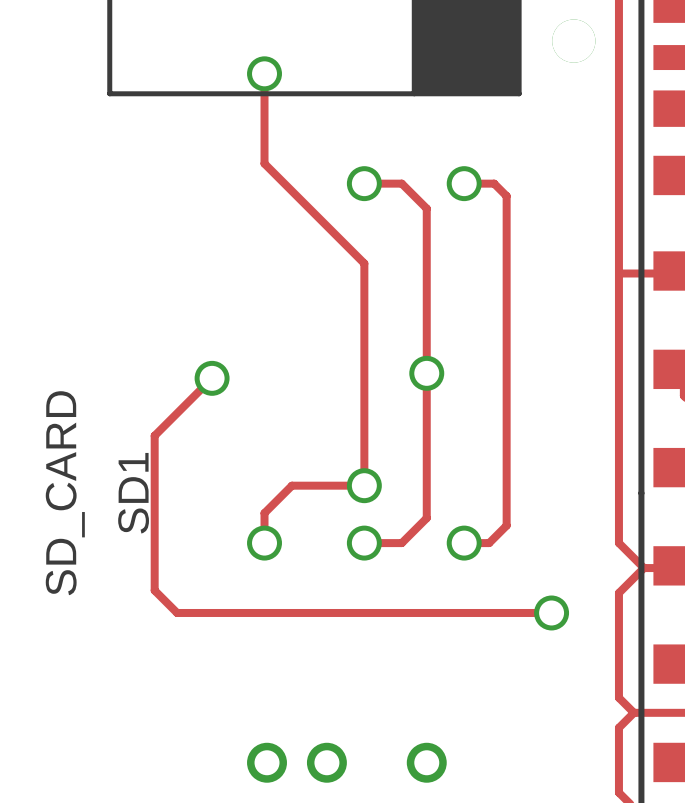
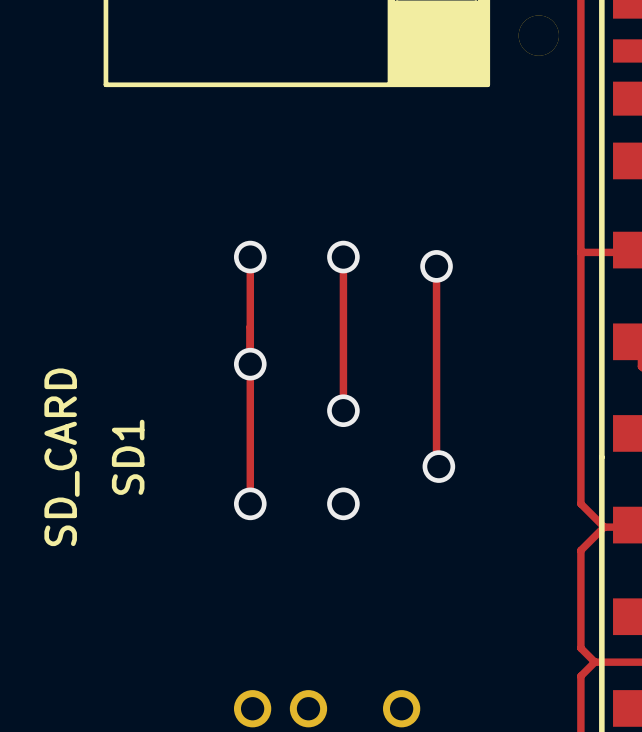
track: (264, 73) (264, 163) (364, 263) (364, 278) -> none
via: (264, 73) -> none
track: (364, 183) (401, 183) (426, 208) (426, 518) (401, 543) (364, 543) -> none
via: (364, 183) -> none
track: (464, 183) (494, 183) (506, 196) (506, 525) (489, 543) (464, 543) -> none
via: (464, 183) -> none
via: none -> (250, 257)
via: none -> (343, 257)
track: none -> (436, 266) (436, 464) (438, 466)
via: none -> (436, 266)
via: (426, 373) -> none
track: (212, 378) (154, 435) (154, 590) (177, 612) (551, 612) -> none
via position: (212, 378) -> (250, 364)
track: (364, 443) (364, 485) (291, 485) (264, 513) -> (250, 257) (250, 475)
via position: (364, 485) -> (343, 410)
via position: (464, 543) -> (438, 466)
via: (551, 612) -> none

